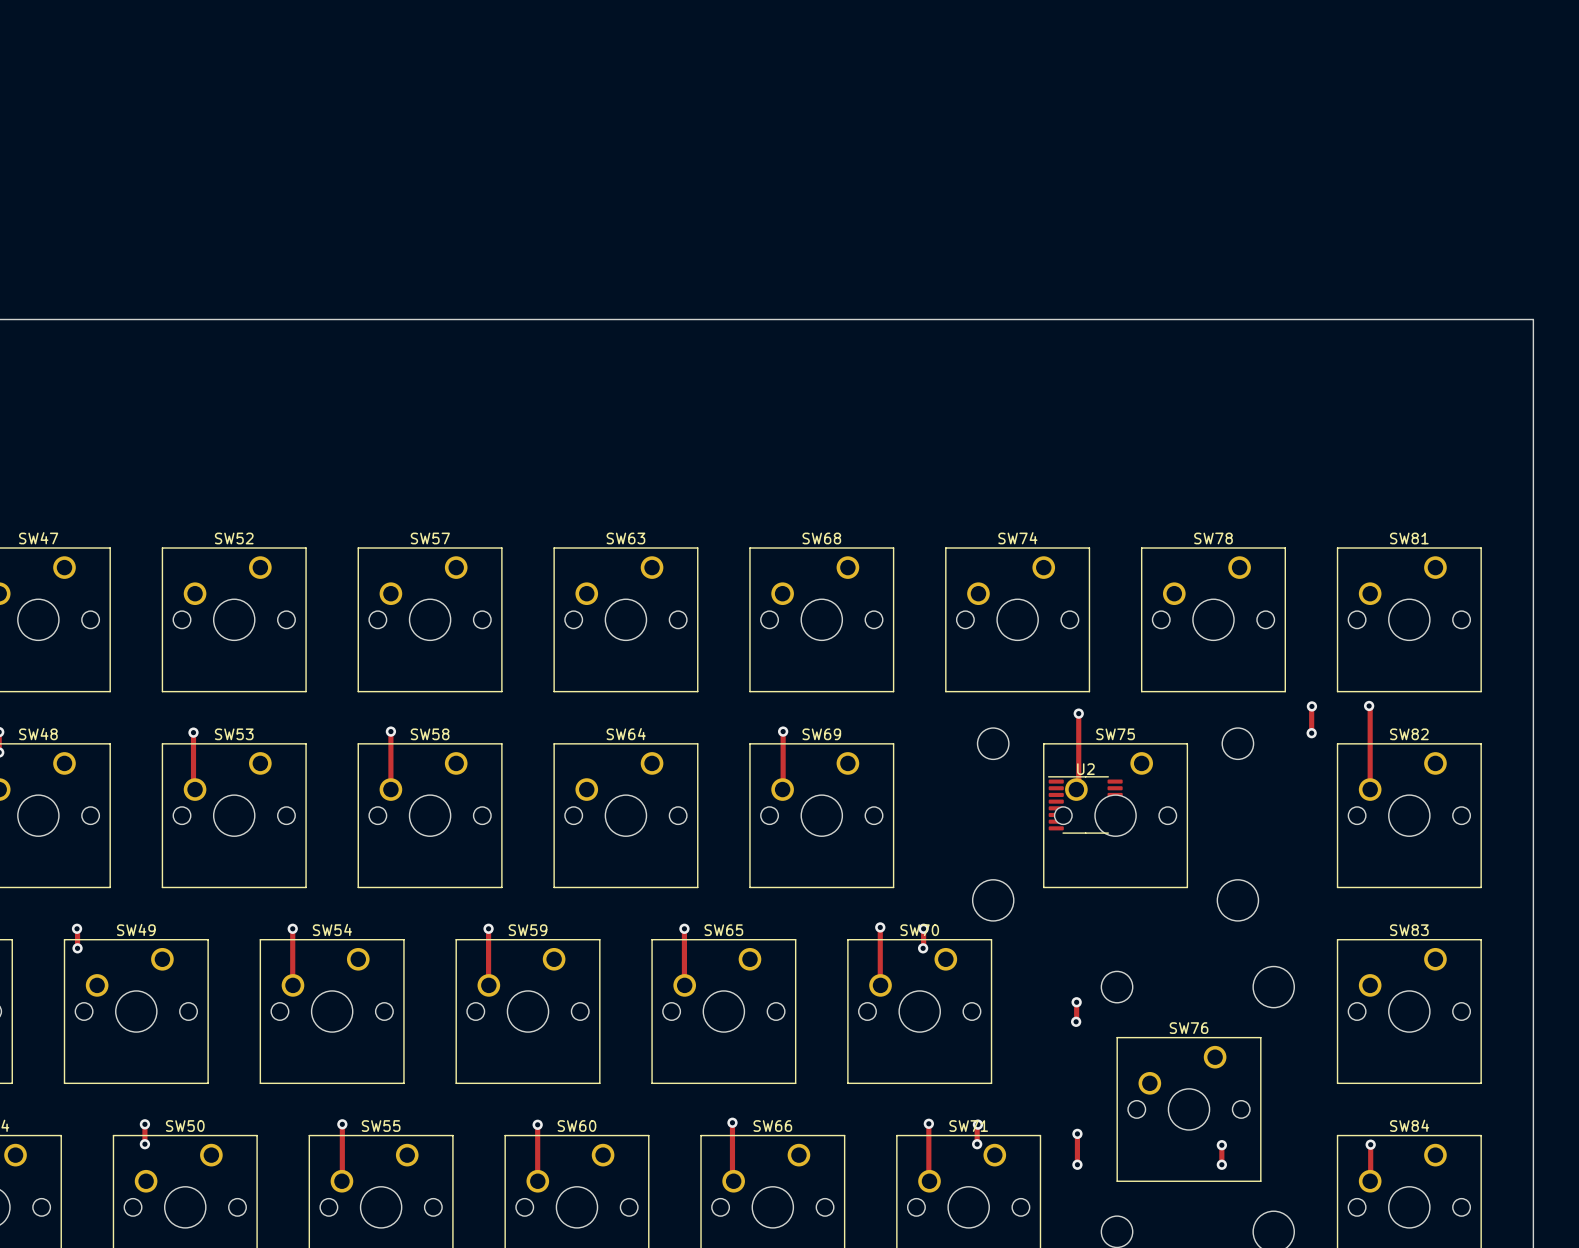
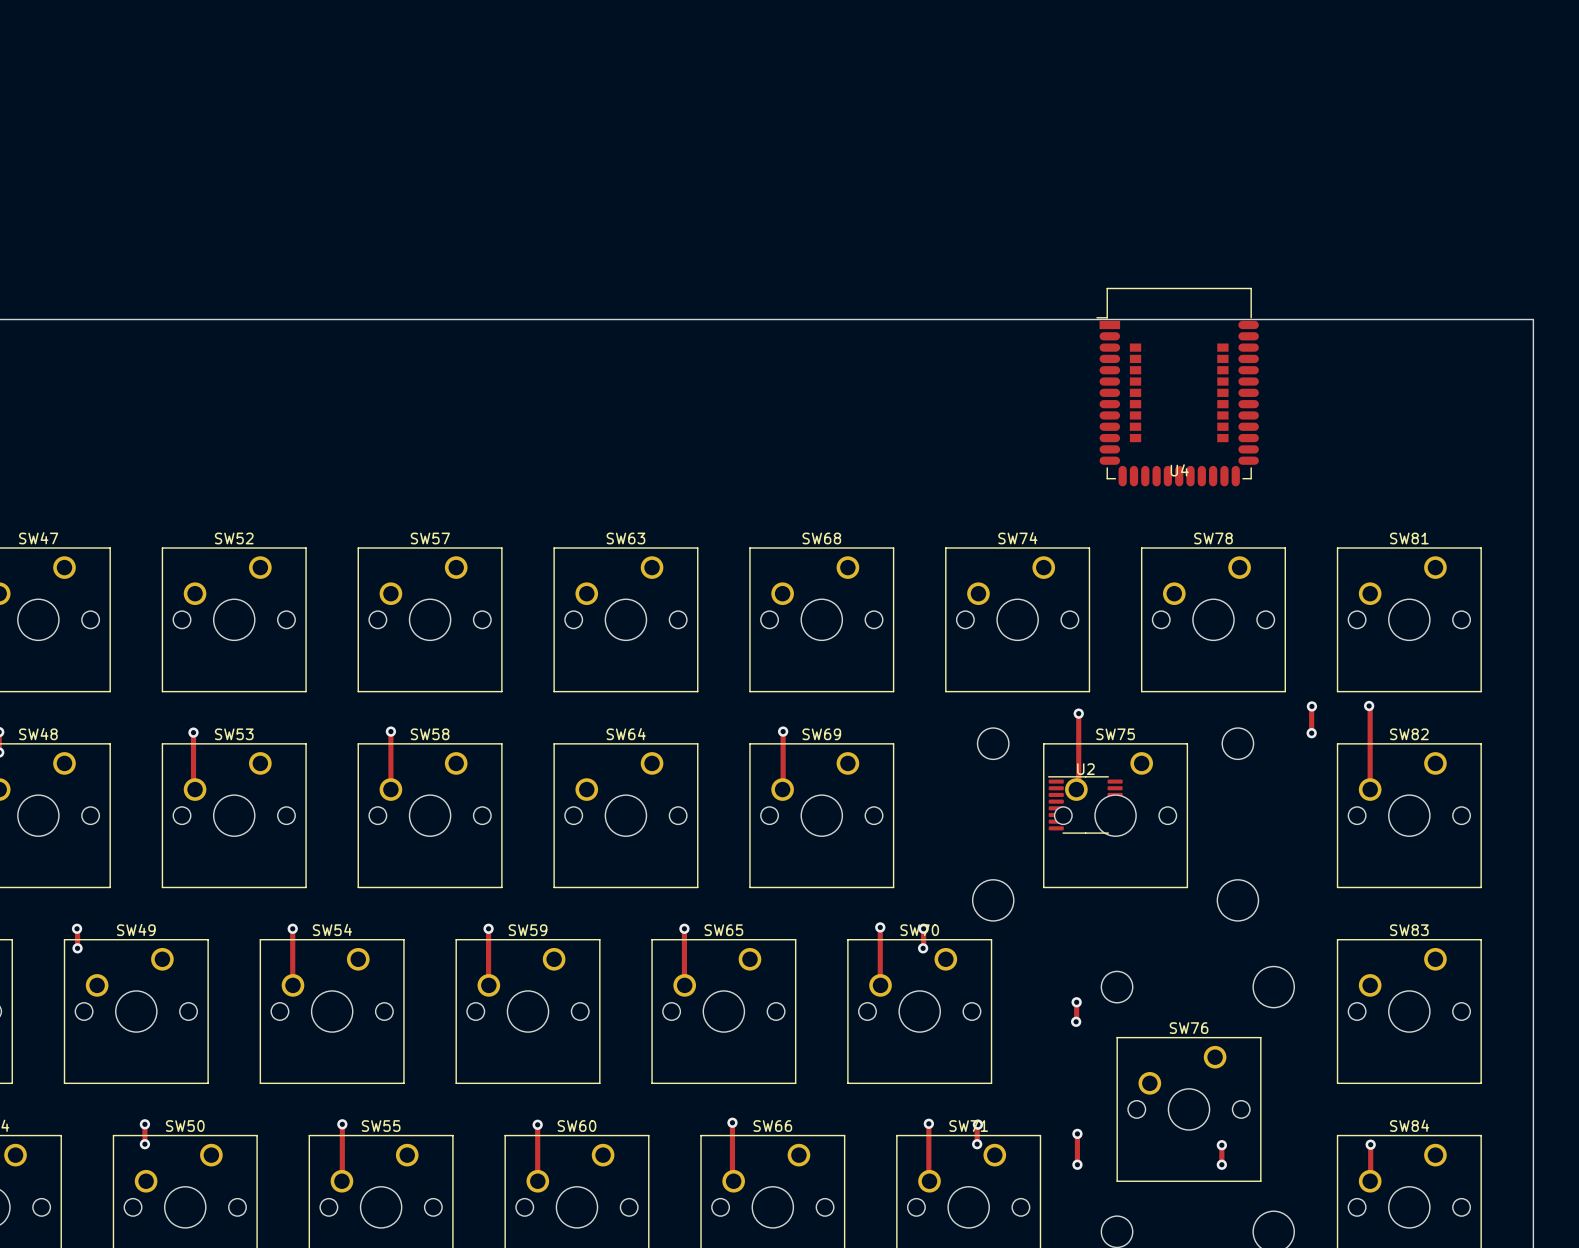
U4: none -> (1177, 387)

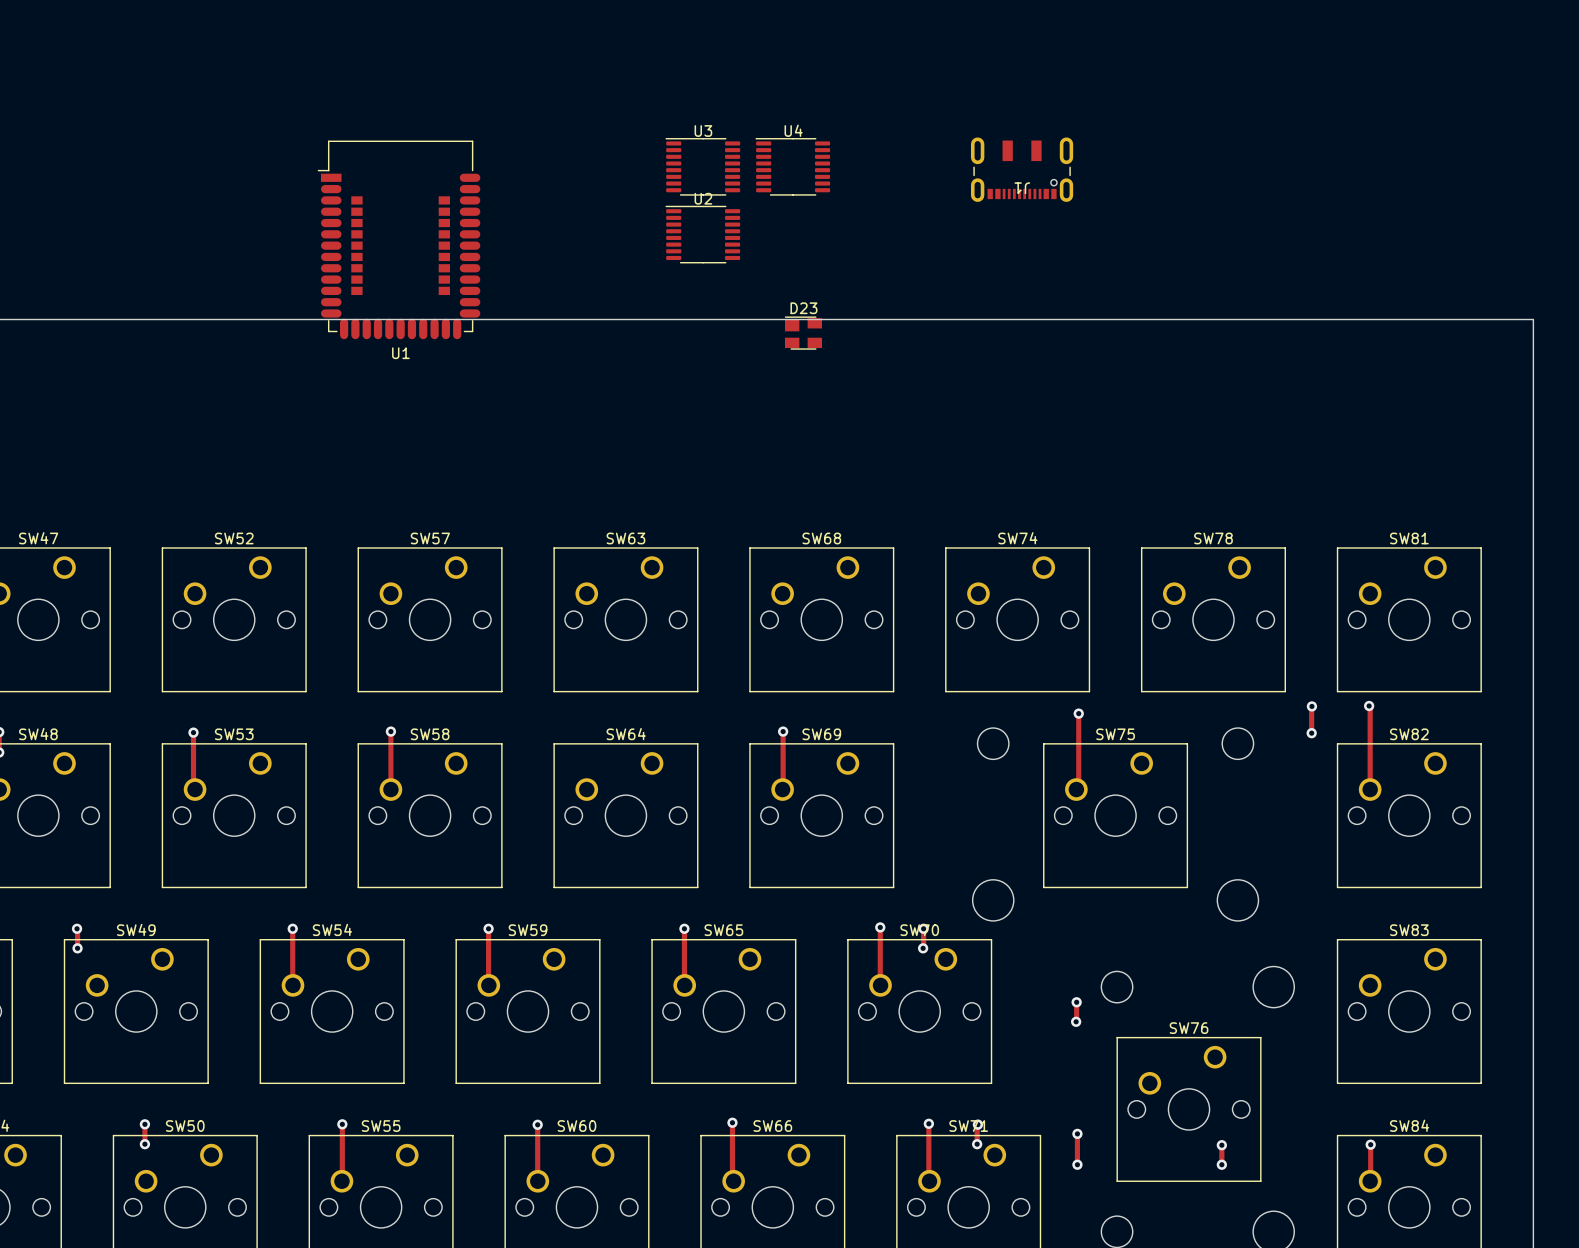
U3: none -> (702, 166)
J1: none -> (1022, 169)
U1: none -> (399, 239)
U4 footprint: [1096, 287, 1259, 487] -> [755, 138, 831, 196]
D23: none -> (803, 333)
U4 name position: U4 (1179, 470) -> U4 (793, 130)
U2 position: (1085, 804) -> (702, 234)

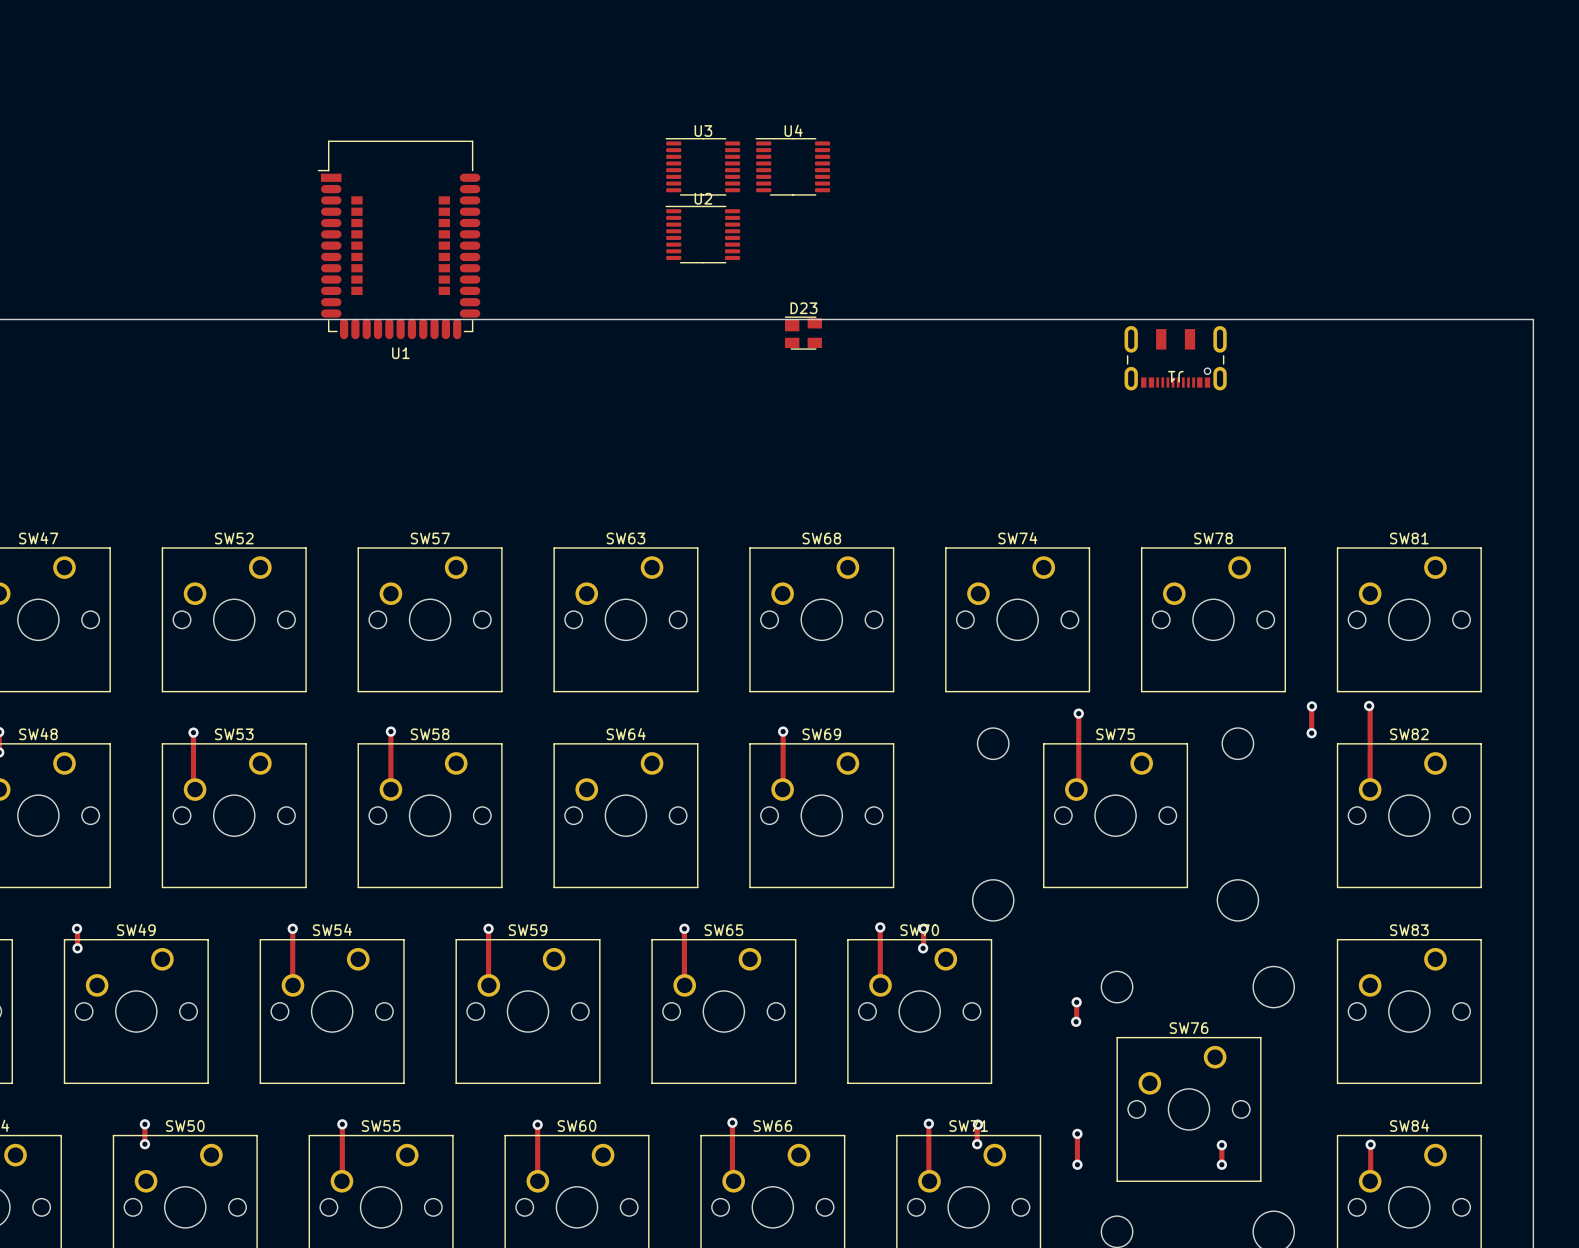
J1 position: (1022, 169) -> (1175, 358)

